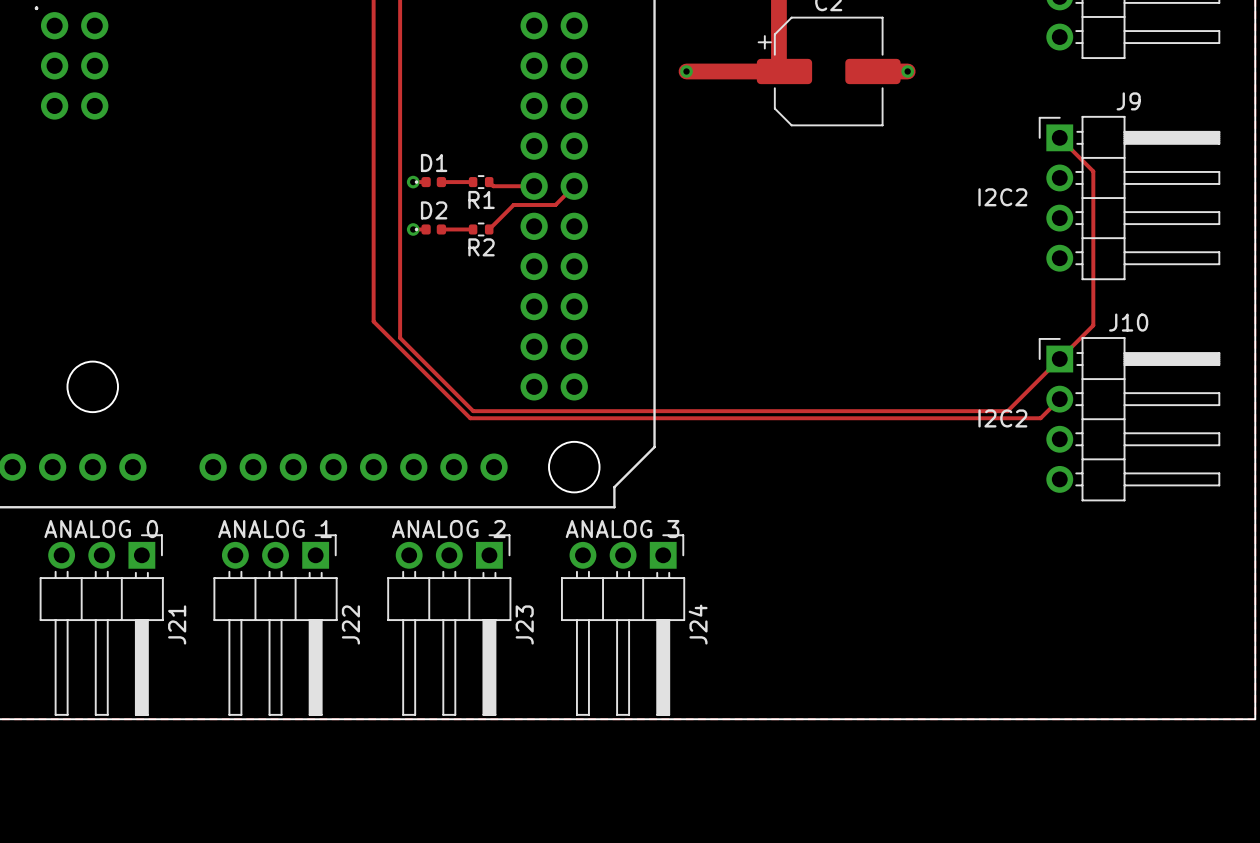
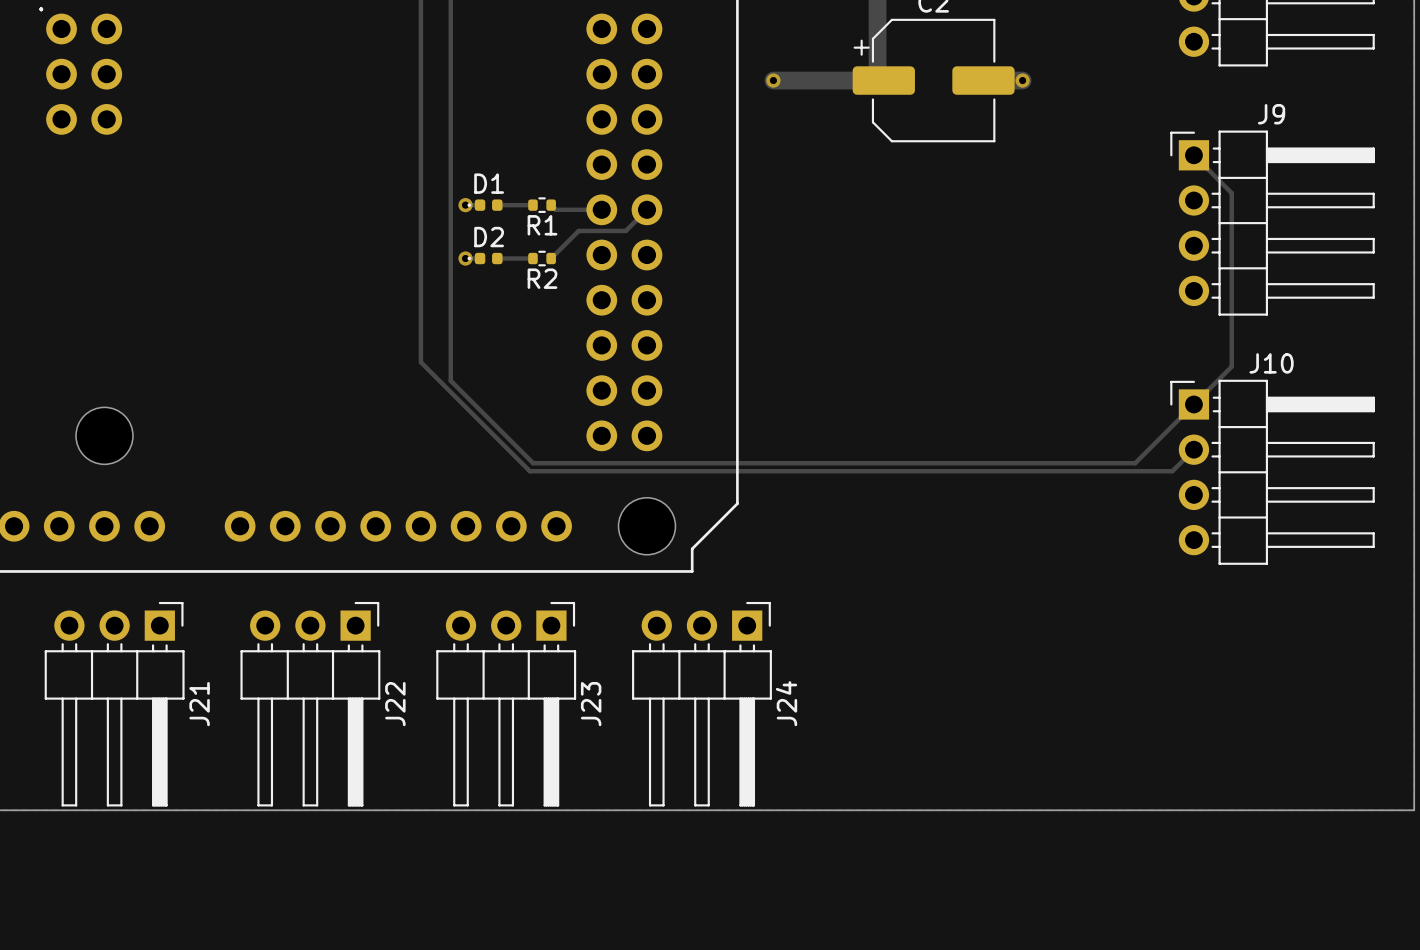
text: I2C2 (1002, 197) -> none
text: I2C2 (1002, 418) -> none
text: ANALOG 0 (101, 529) -> none
text: ANALOG 1 (275, 529) -> none
text: ANALOG 2 (448, 529) -> none
text: ANALOG 3 (622, 529) -> none

